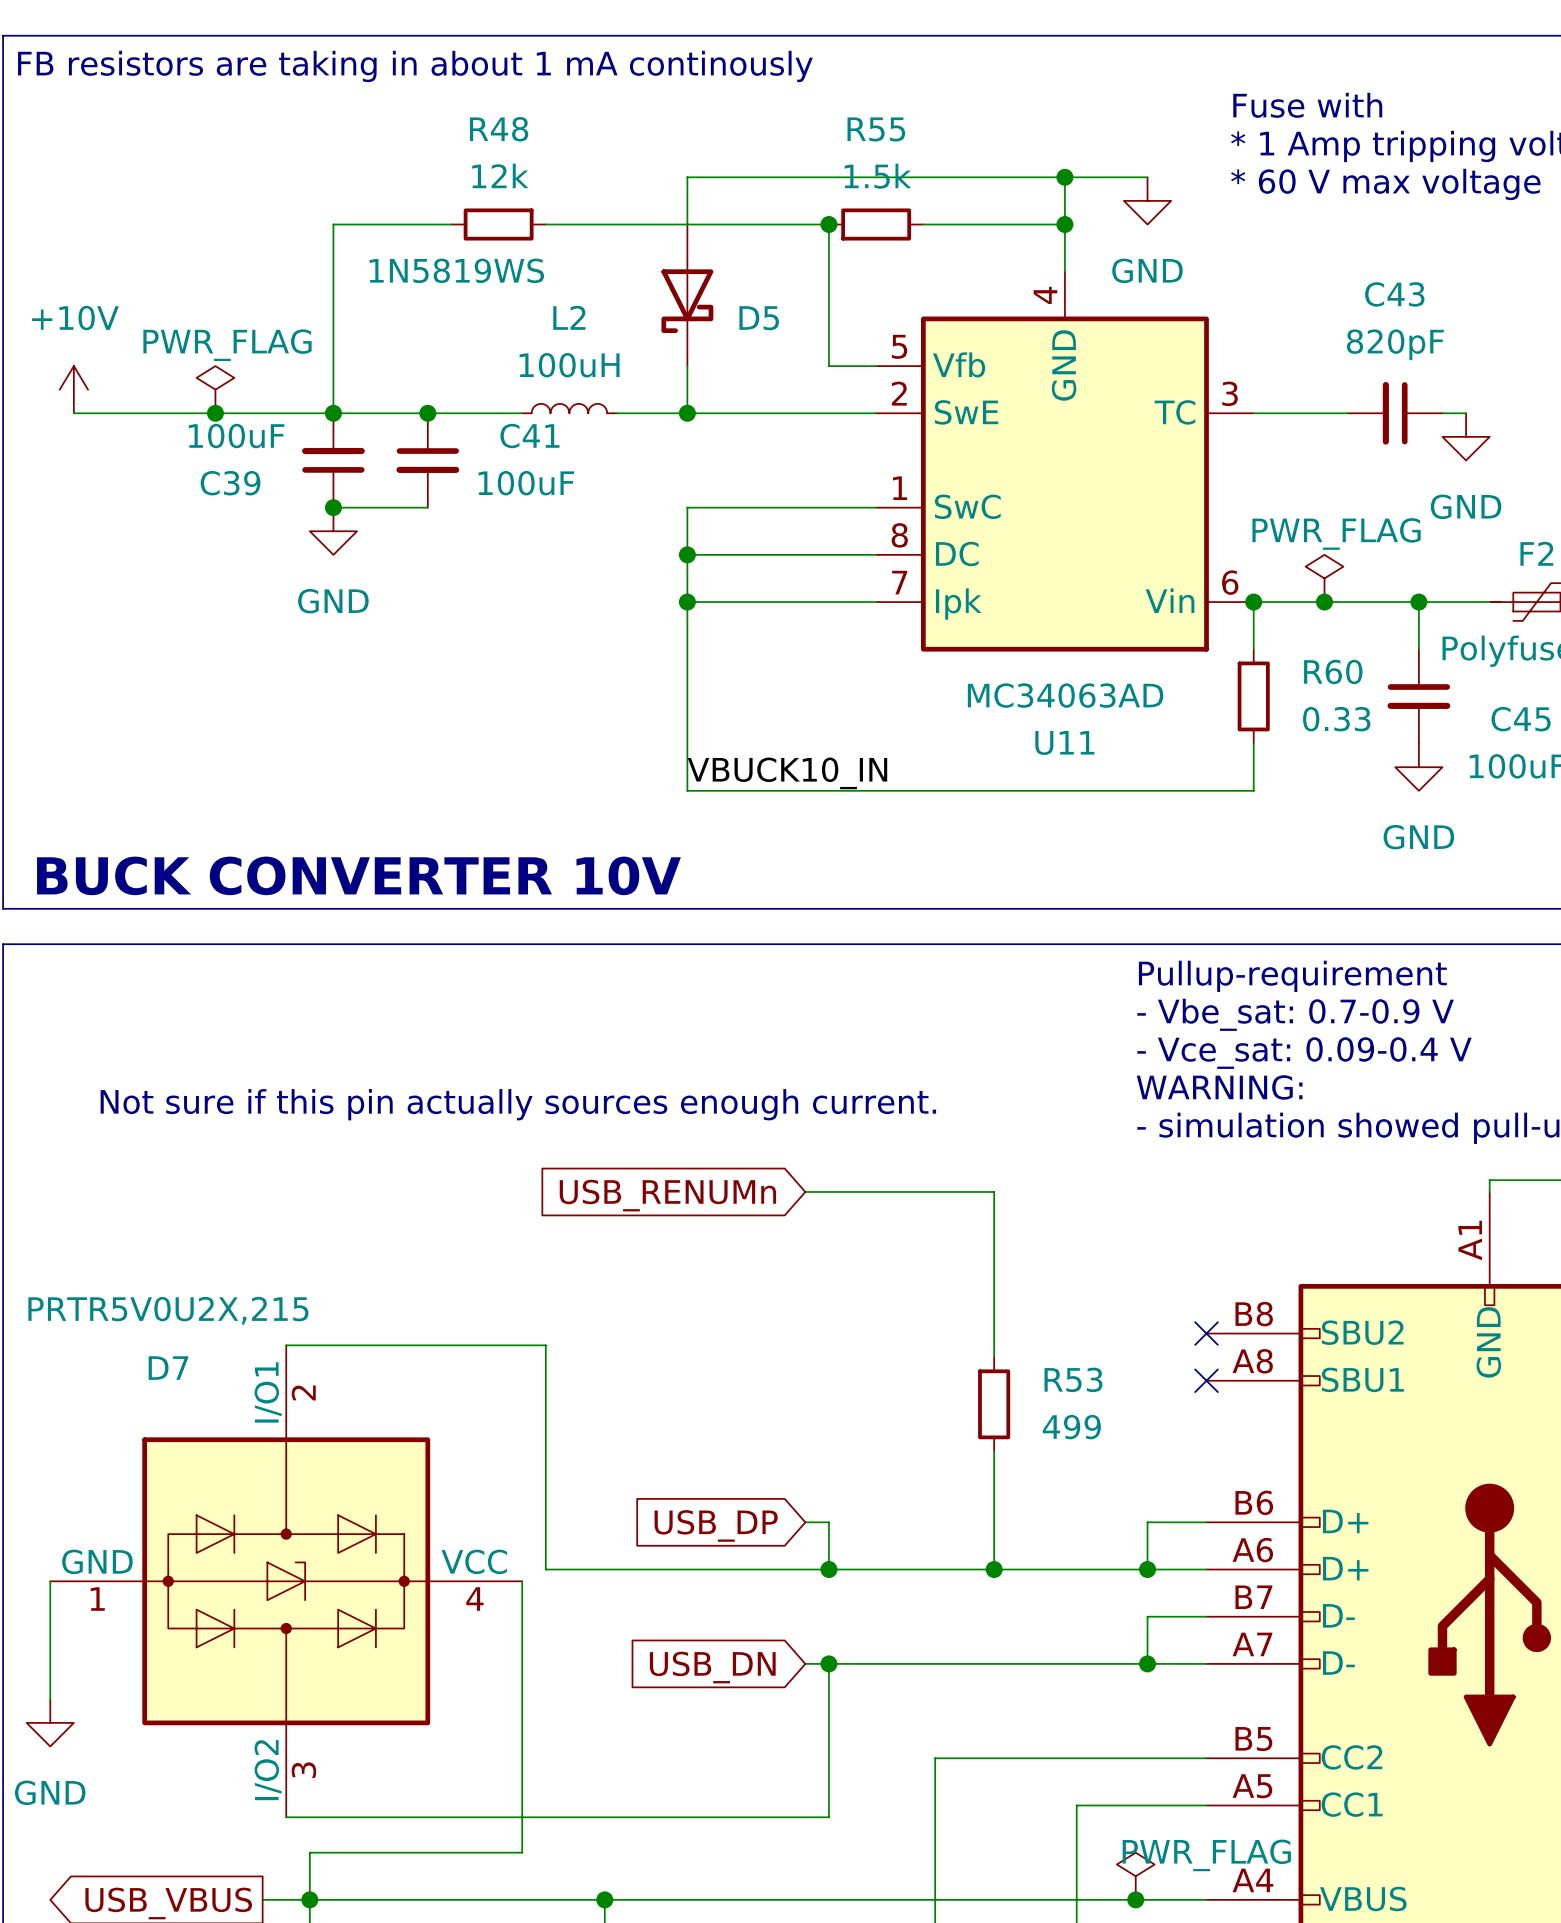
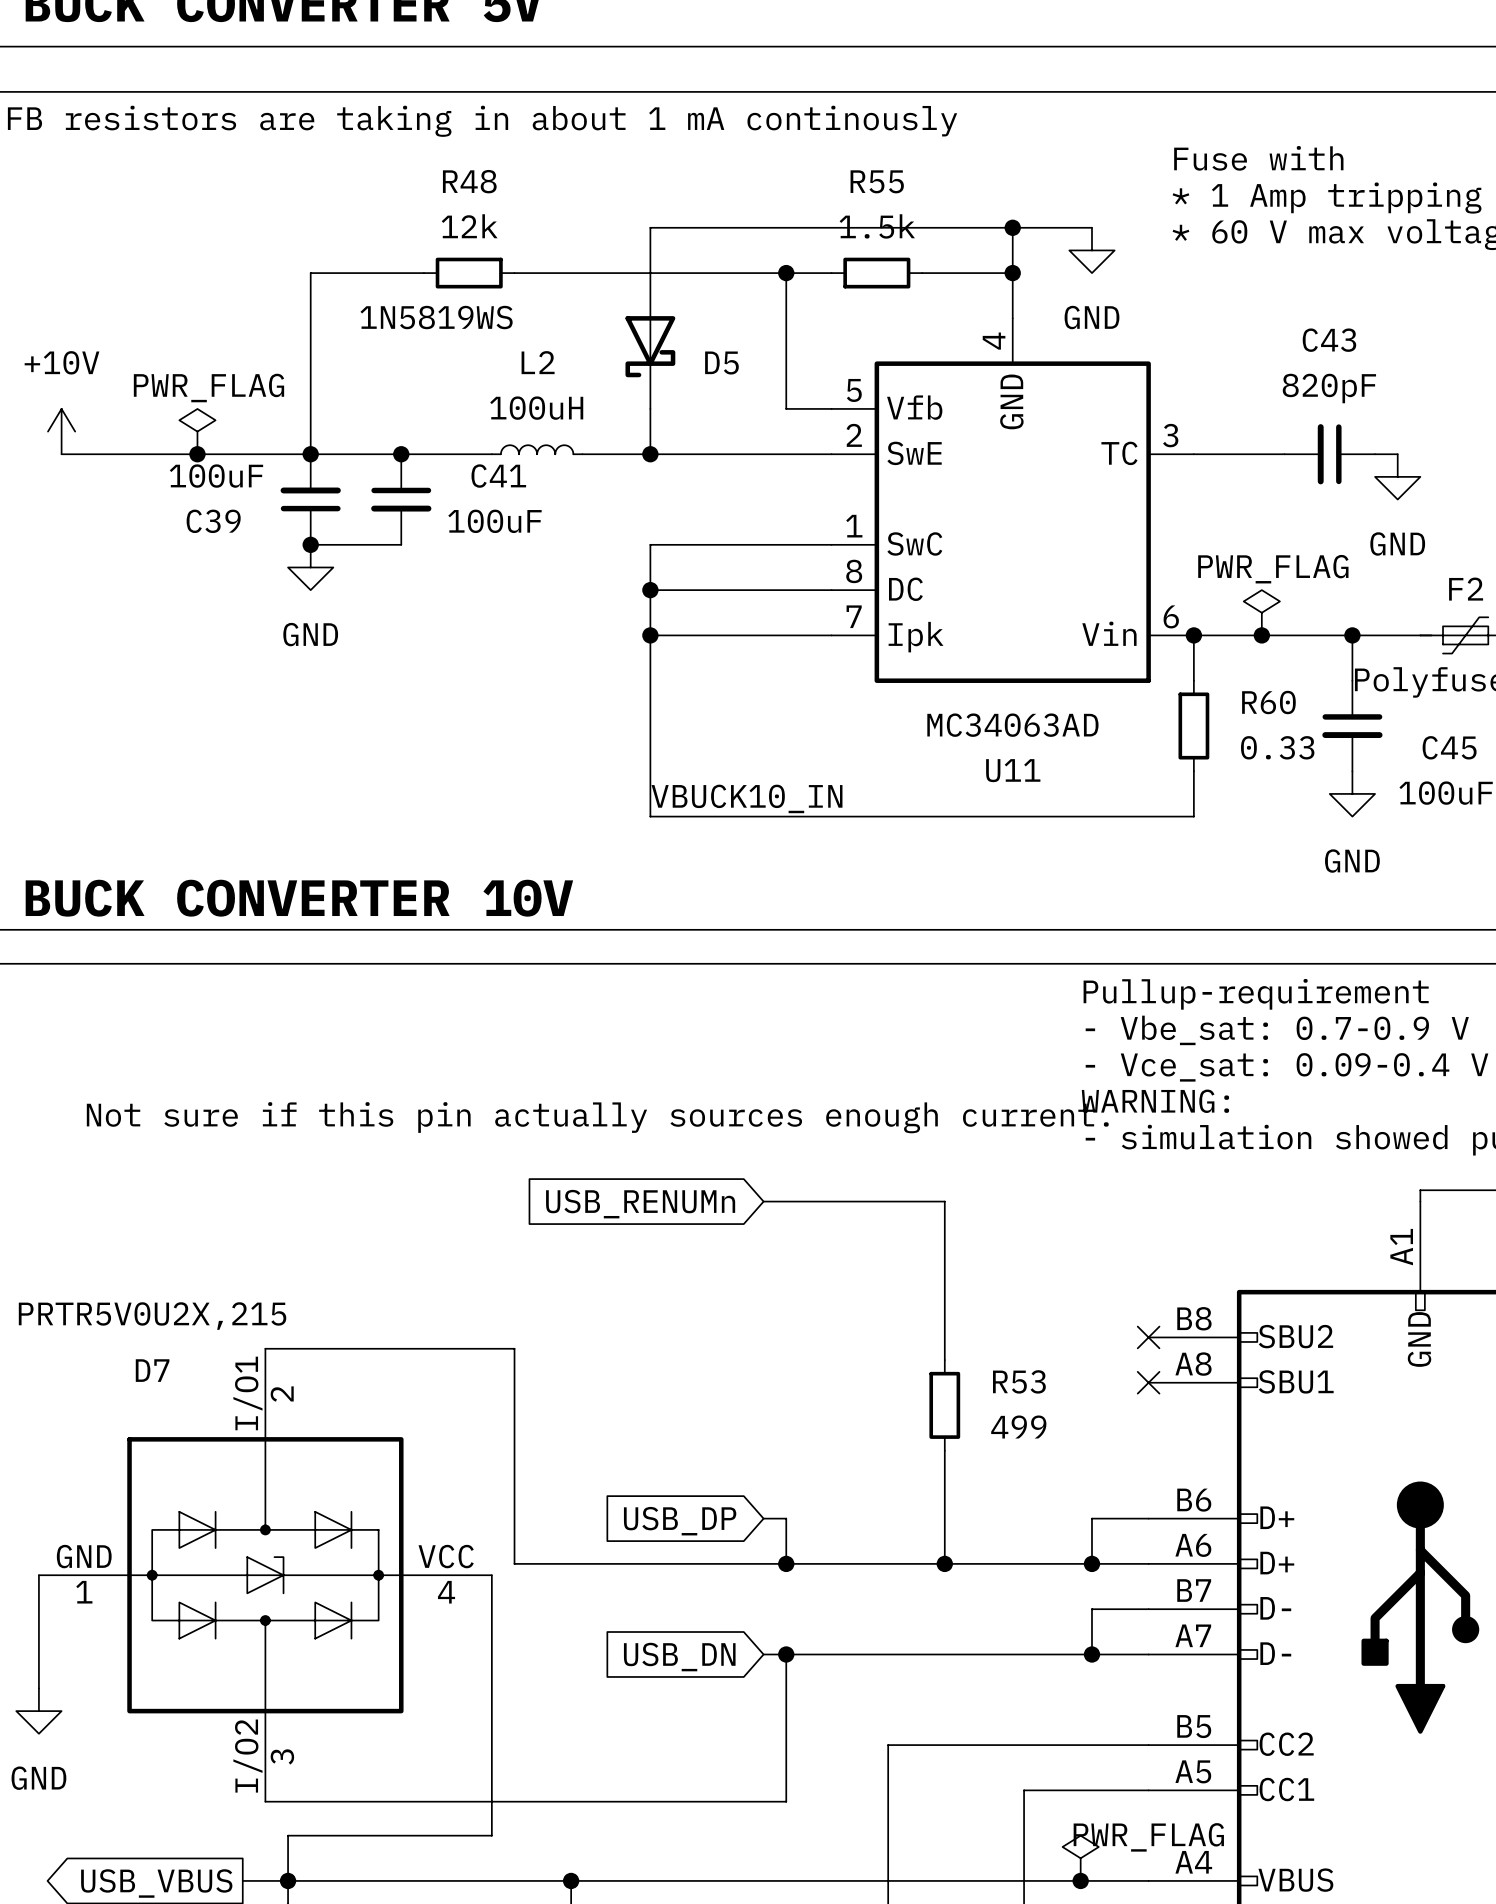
R55 position: (876, 224) -> (876, 273)
wire: (923, 224) (970, 224) -> (786, 273) (831, 273)

